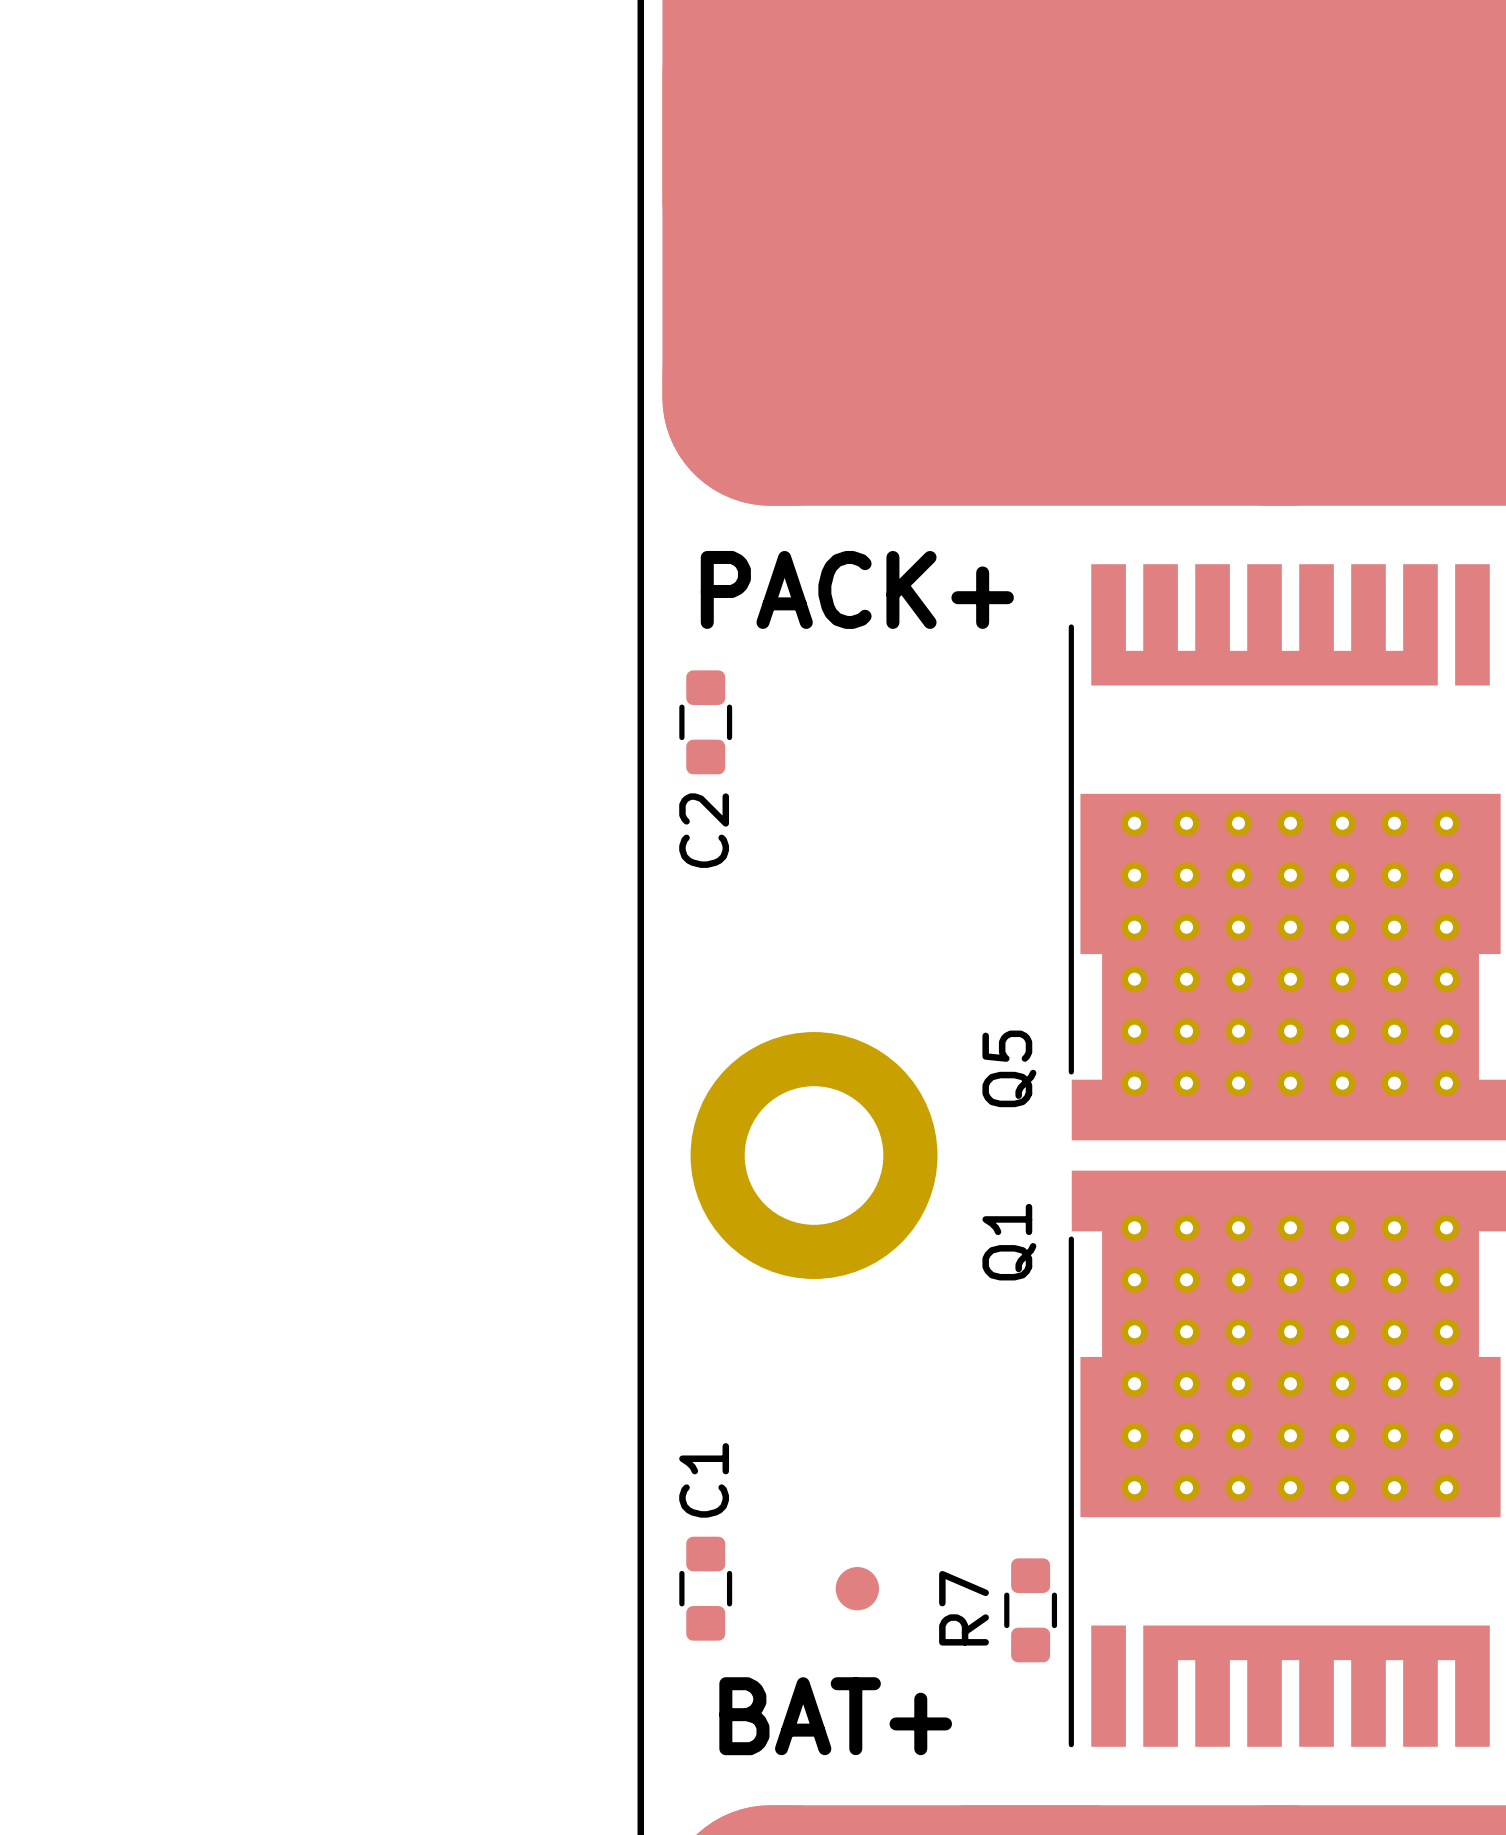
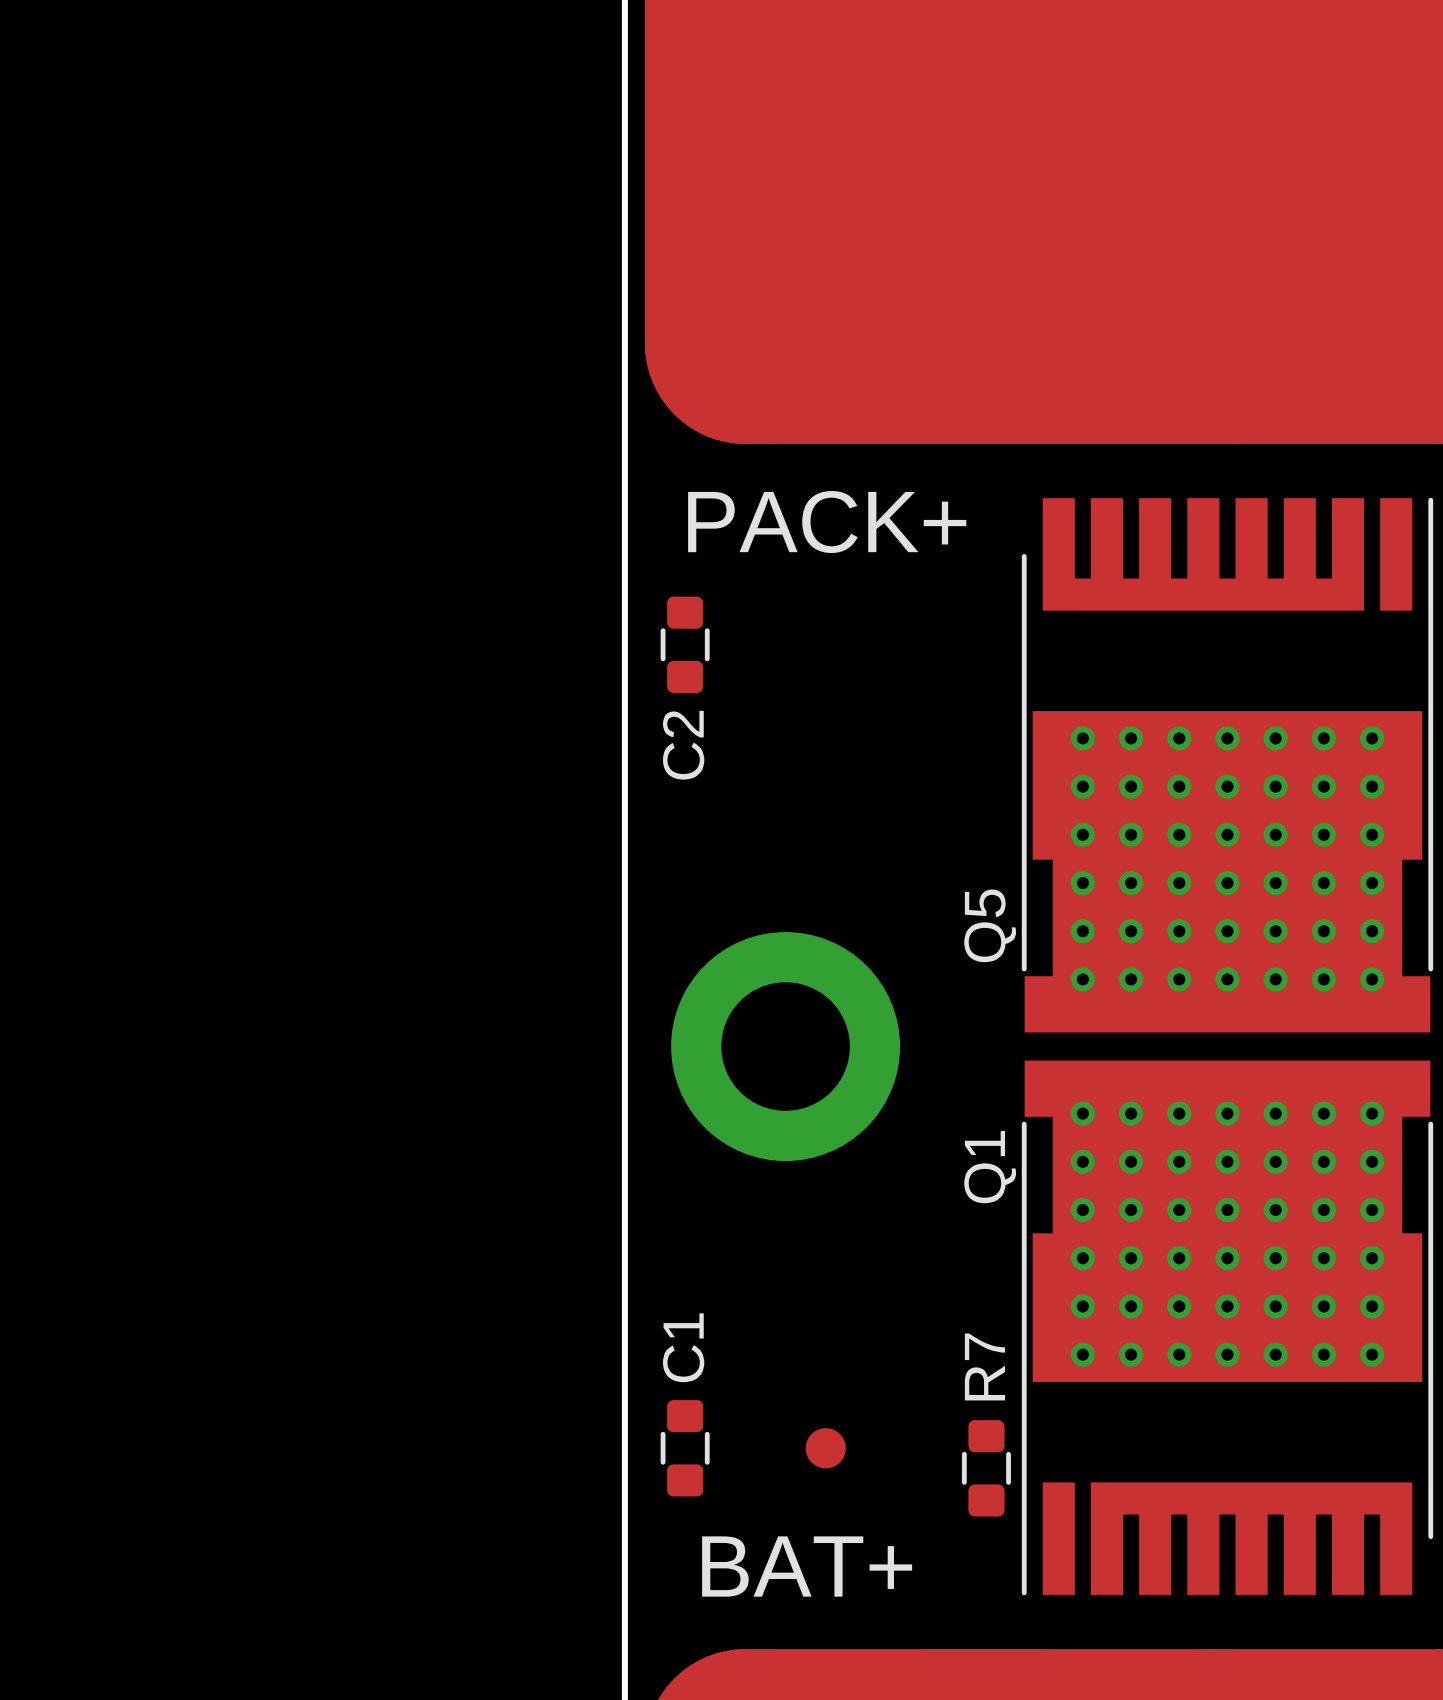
Q5 name position: Q5 (1009, 1068) -> Q5 (990, 925)
Q1 name position: Q1 (1009, 1242) -> Q1 (990, 1167)
R7 name position: R7 (964, 1608) -> R7 (984, 1366)

